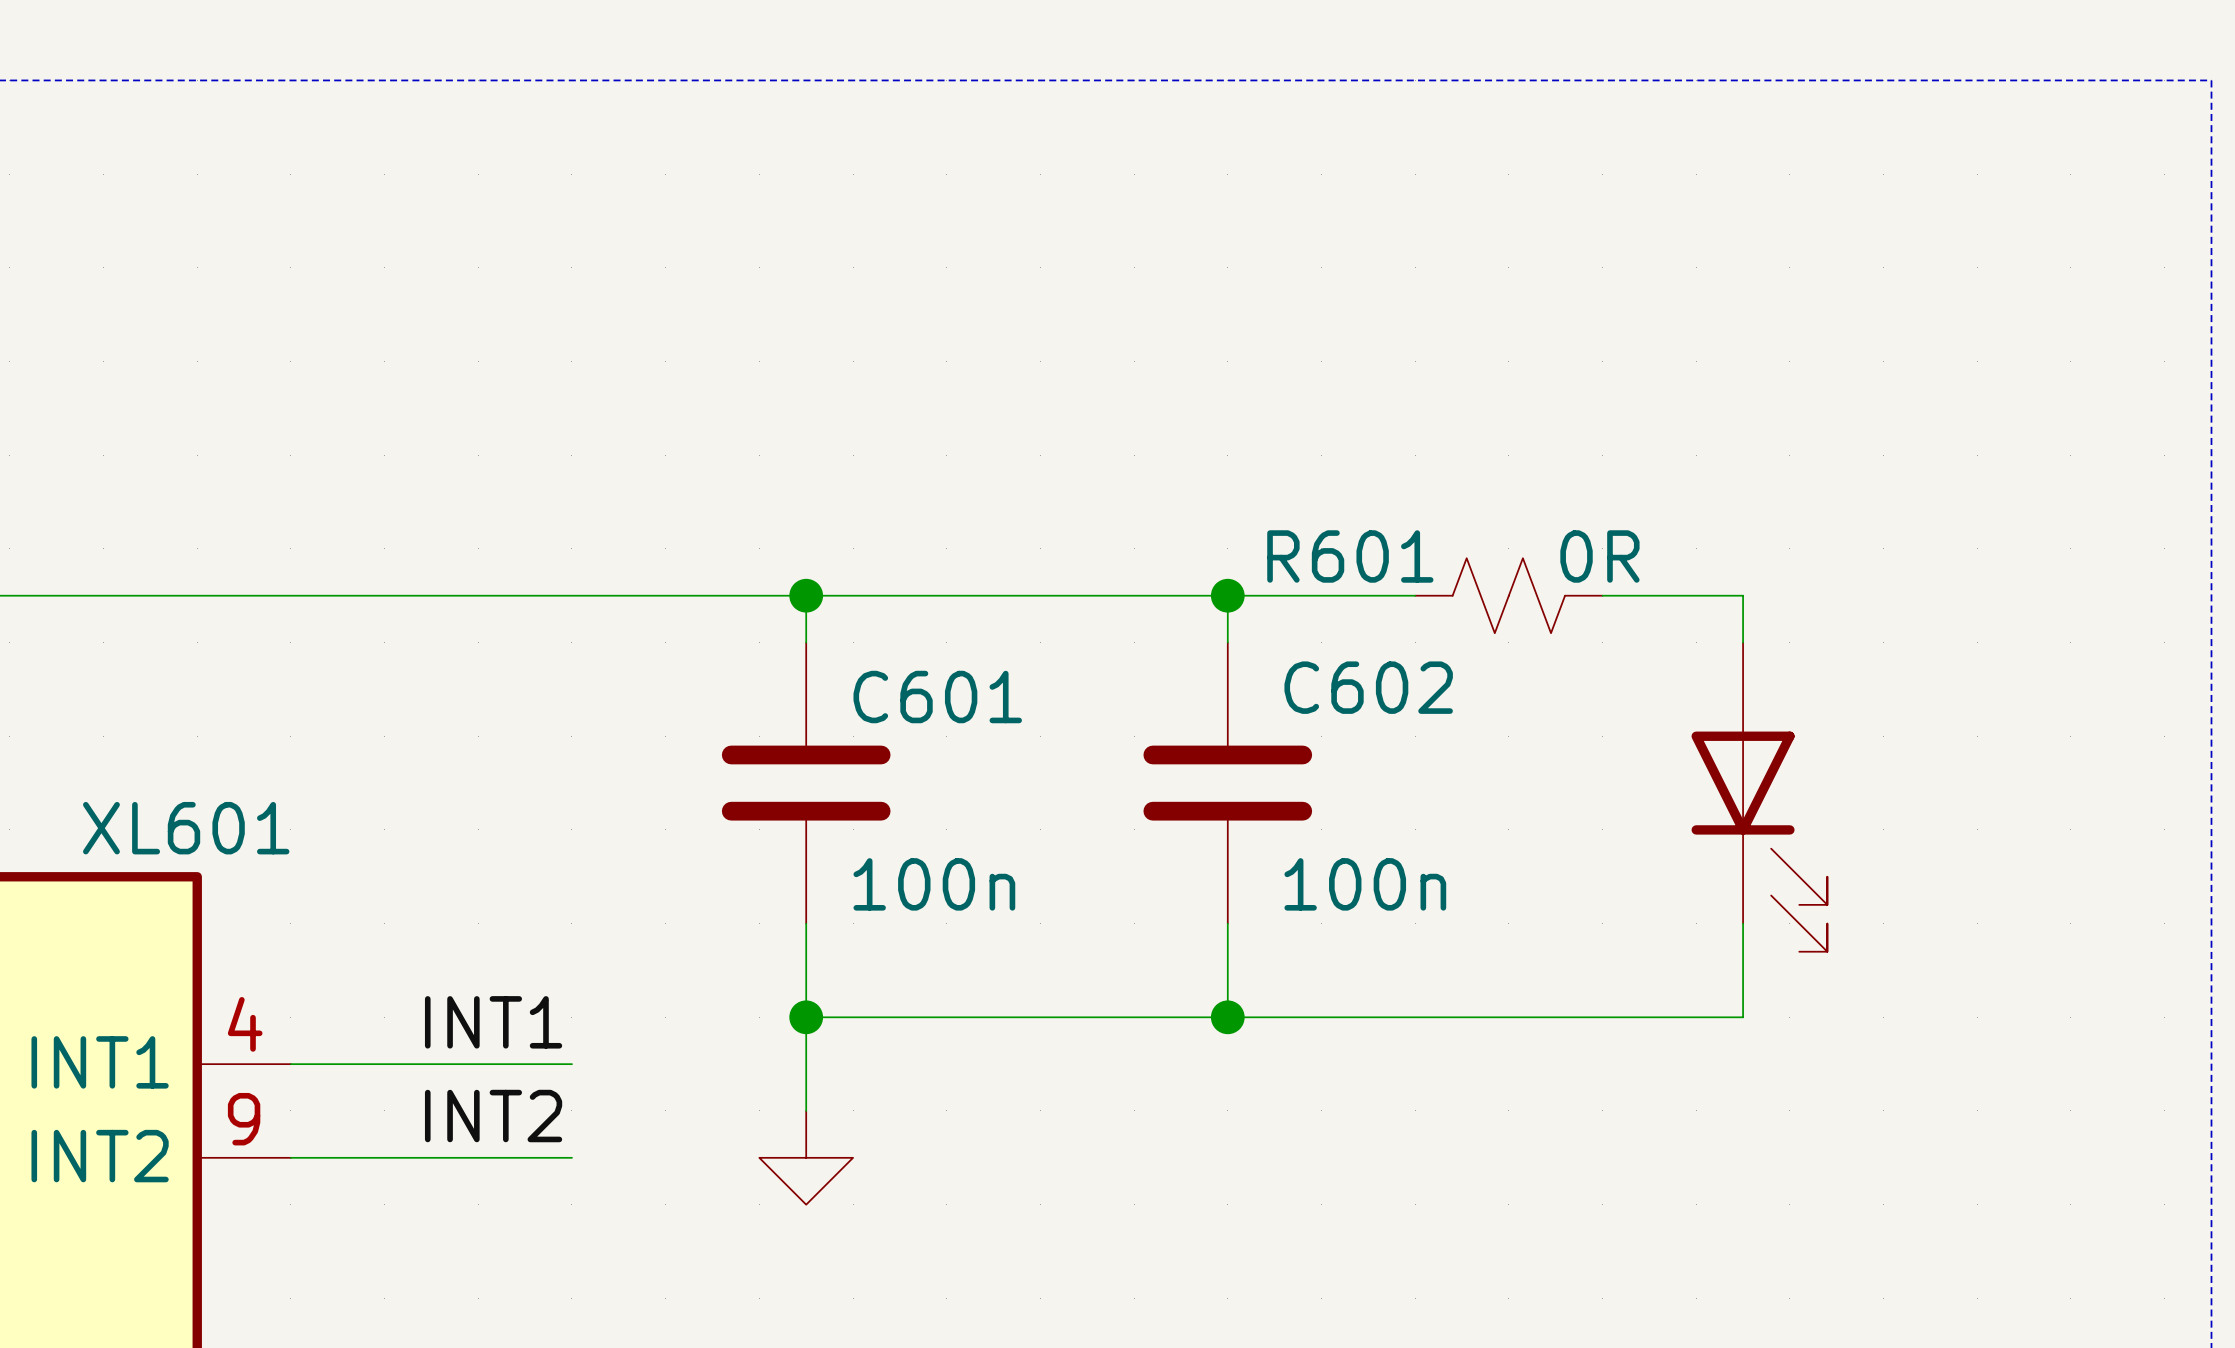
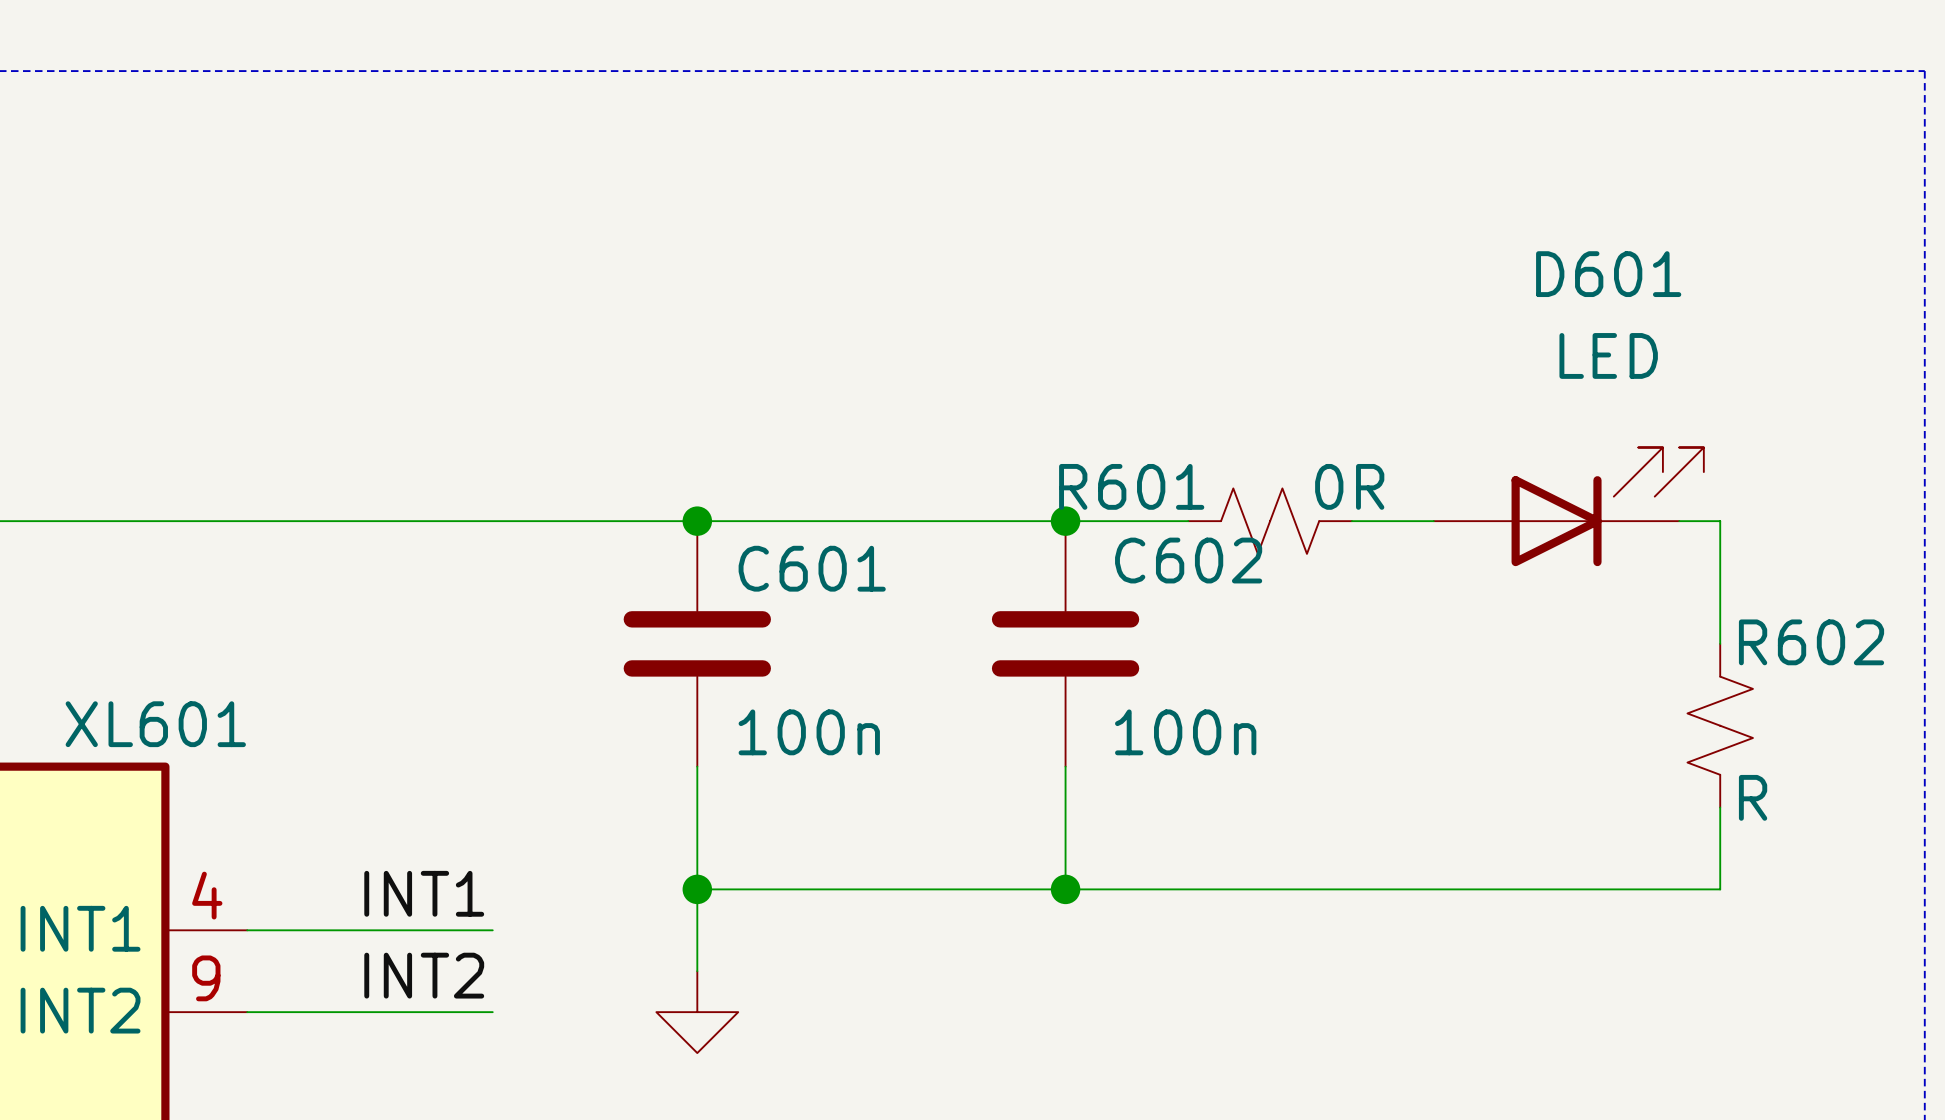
D601: none -> LED (1568, 506)
R601 position: (1508, 595) -> (1270, 521)
wire: none -> (1679, 521) (1720, 521) (1720, 643)
C601 position: (806, 783) -> (697, 643)
C602 position: (1227, 783) -> (1065, 643)
part: (1759, 797) -> none
R602: none -> R (1720, 725)
wire: (1743, 923) (1743, 1017) -> (1720, 807) (1720, 889) (1515, 889)

